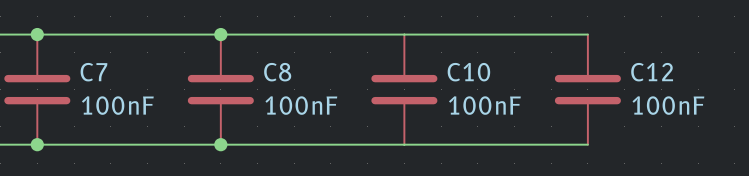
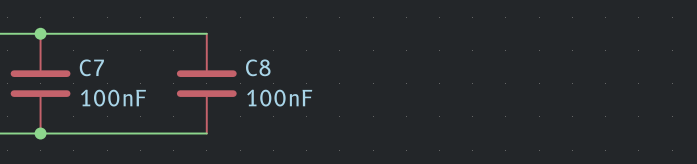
wire: (220, 34) (587, 34) -> none
junction: (220, 34) -> none
C10: 100nF (404, 89) -> none
C12: 100nF (587, 89) -> none
wire: (220, 144) (587, 144) -> none
junction: (220, 144) -> none

